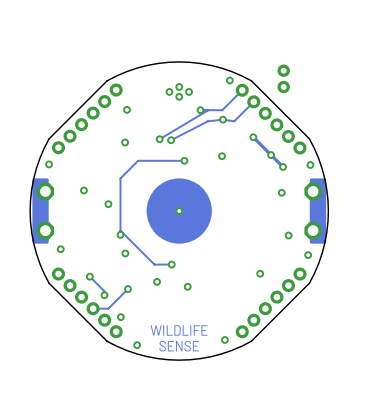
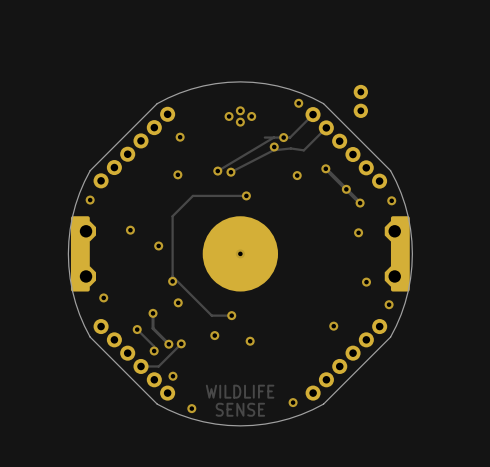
via: (200, 110) -> none
via: none -> (283, 137)
via: none -> (274, 146)
via: (222, 119) -> none
via: none -> (297, 175)
via: (222, 156) -> none
track: none -> (153, 313) (153, 328) (168, 344)
via: none -> (153, 313)
via: none -> (168, 344)

